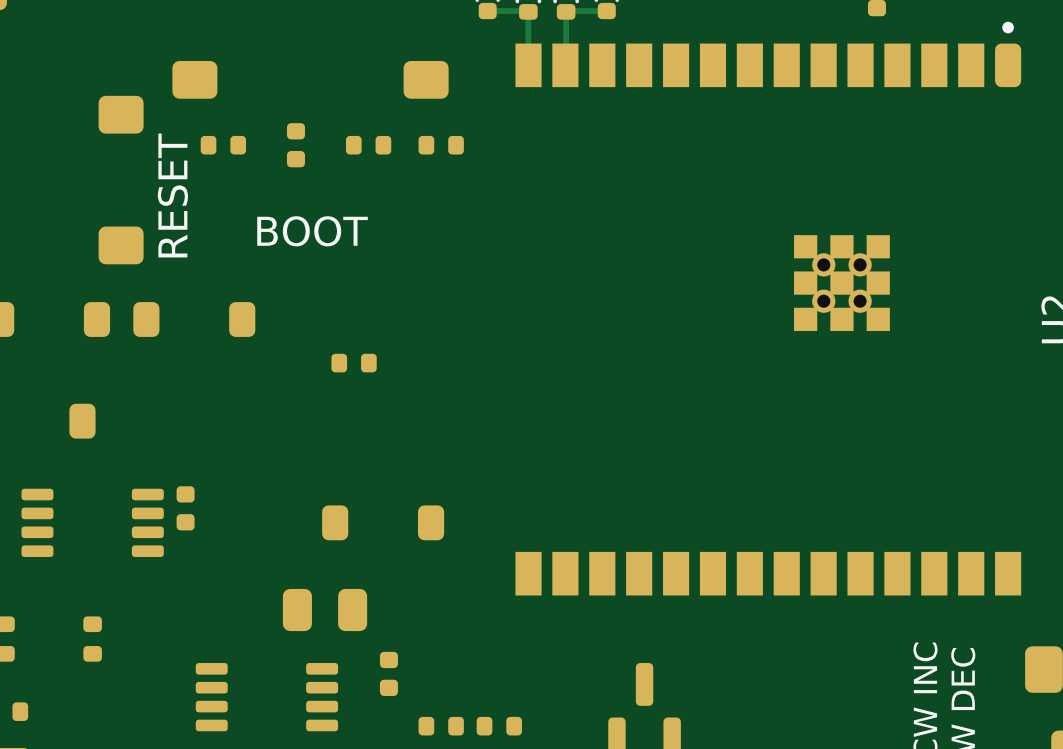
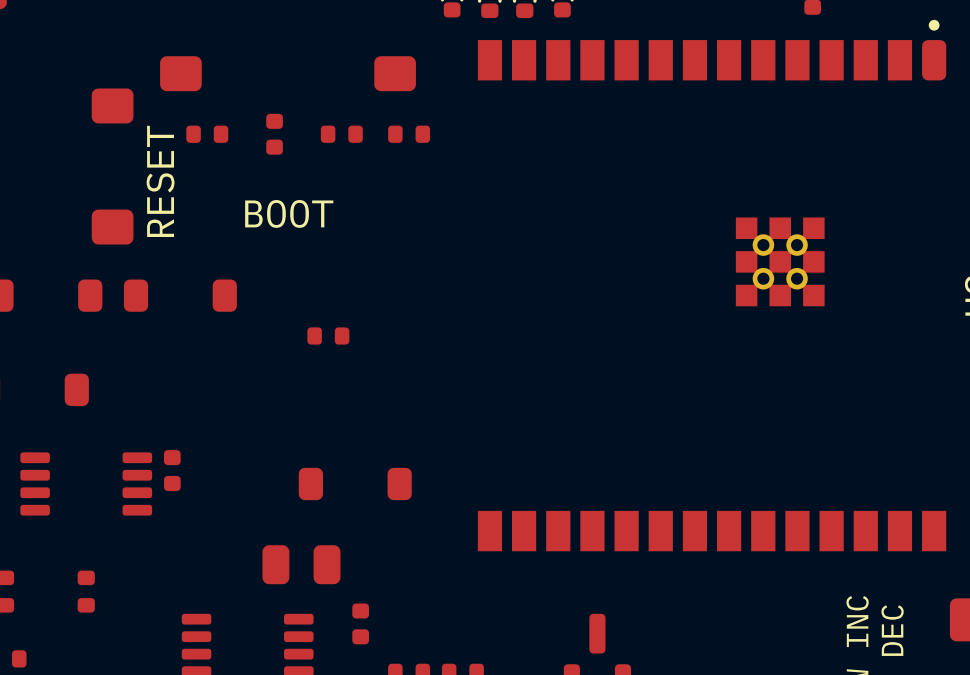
track: (487, 11) (528, 11) (528, 65) -> none
track: (606, 11) (566, 11) (565, 65) -> none

